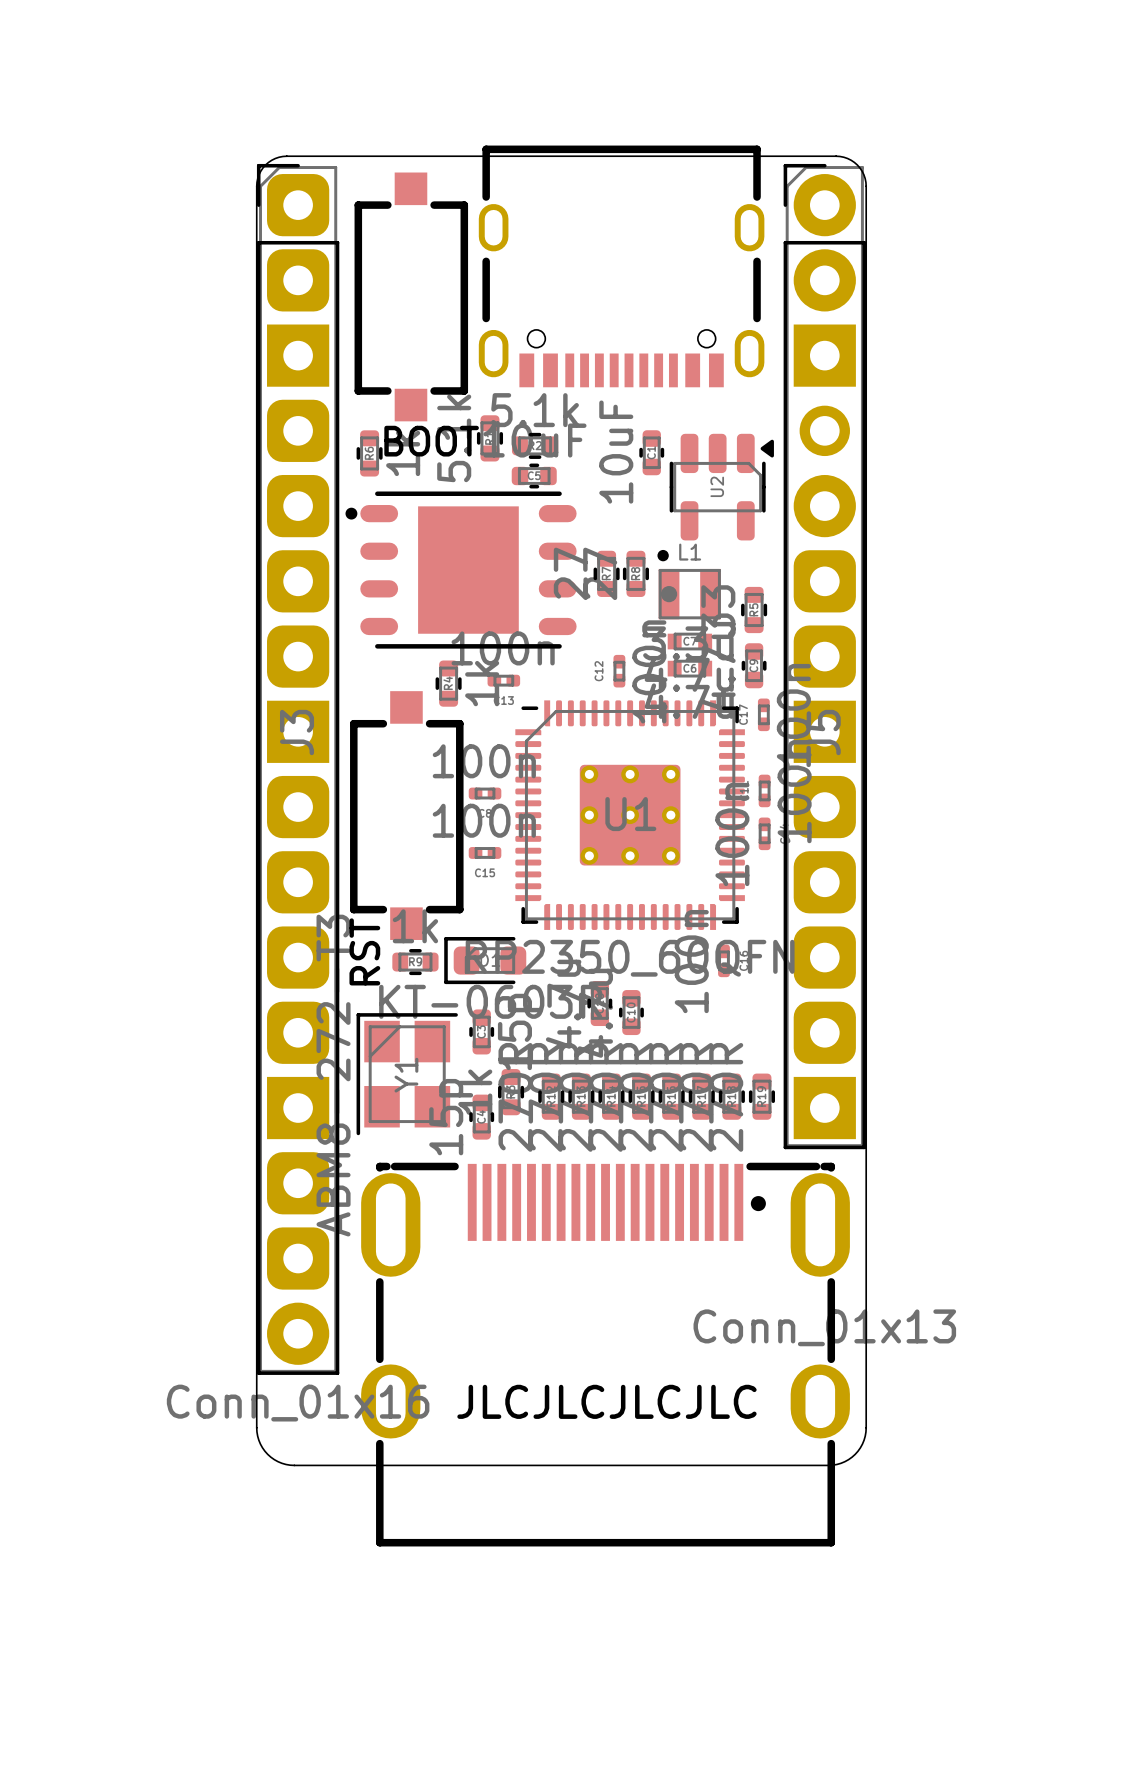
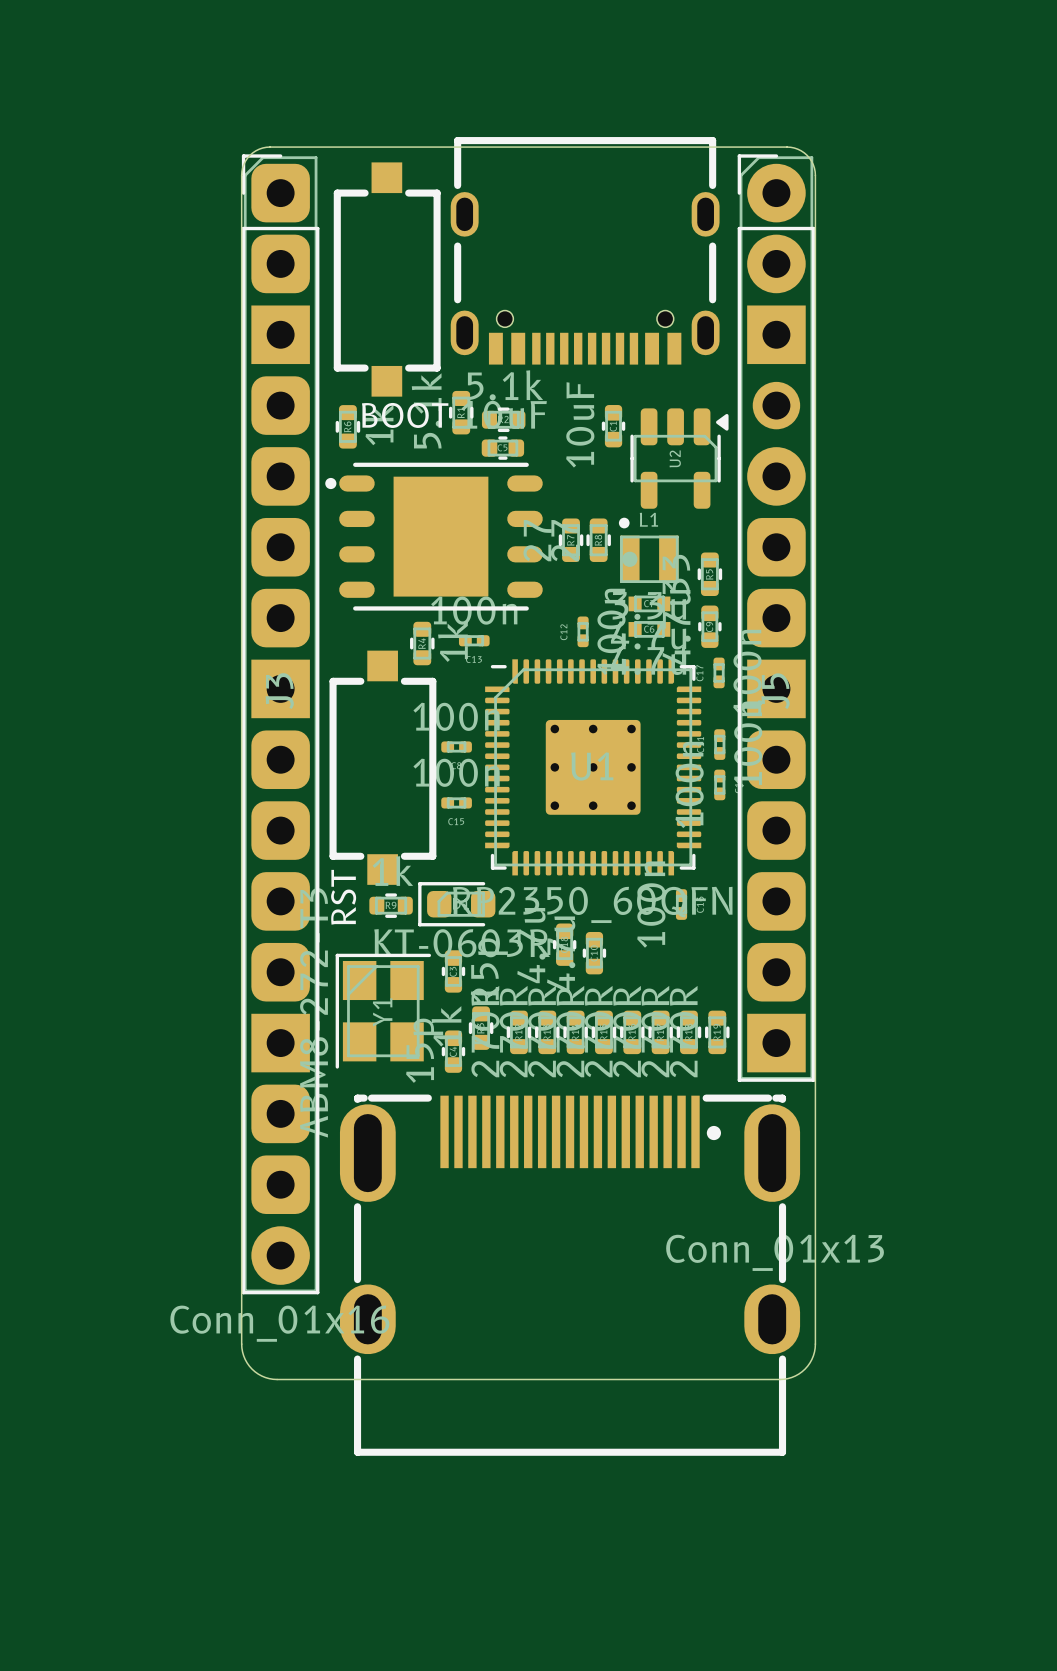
text: JLCJLCJLCJLC (606, 1401) -> none

